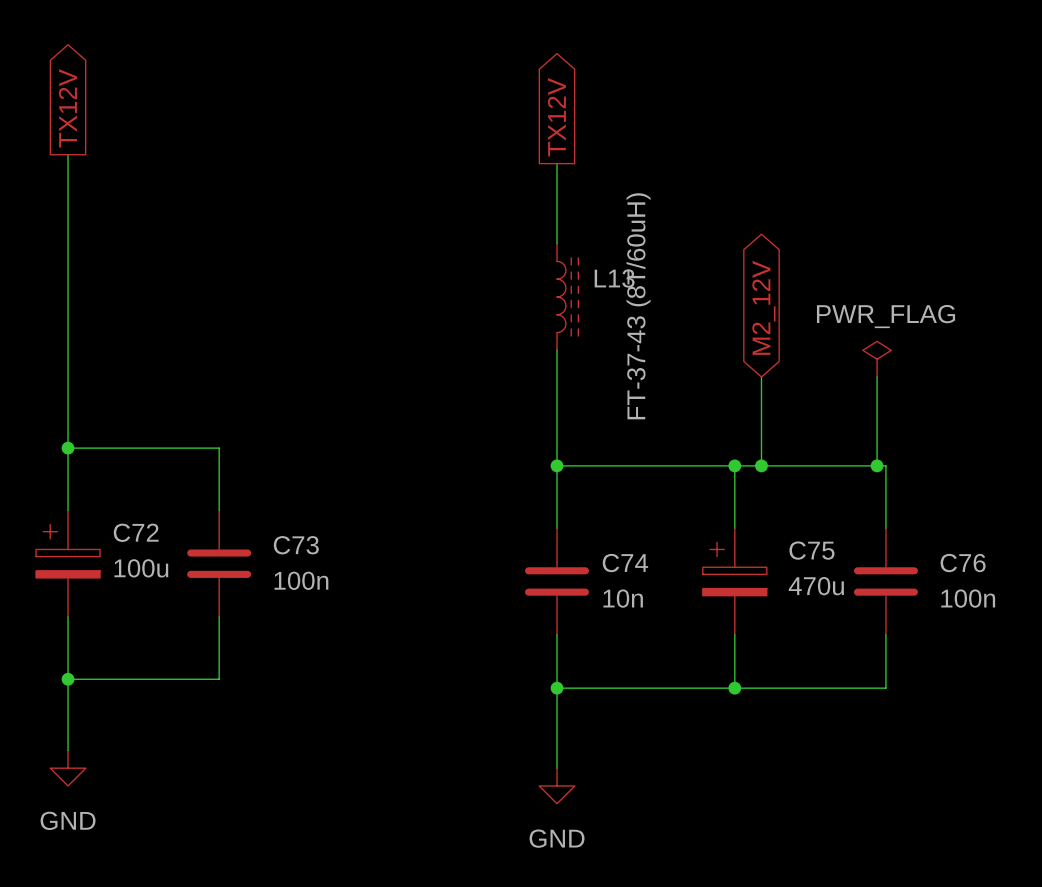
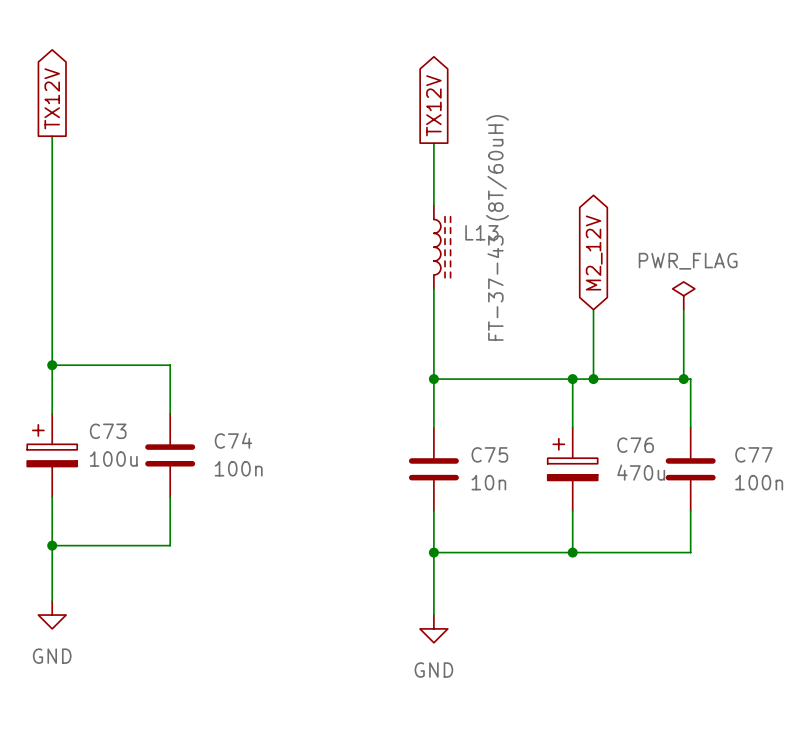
C72 name: C72 (136, 532) -> C73 (108, 431)
C73 name: C73 (296, 545) -> C74 (233, 440)
C75 name: C75 (811, 550) -> C76 (635, 445)
C74 name: C74 (625, 563) -> C75 (489, 454)
C76 name: C76 (963, 563) -> C77 (753, 454)

